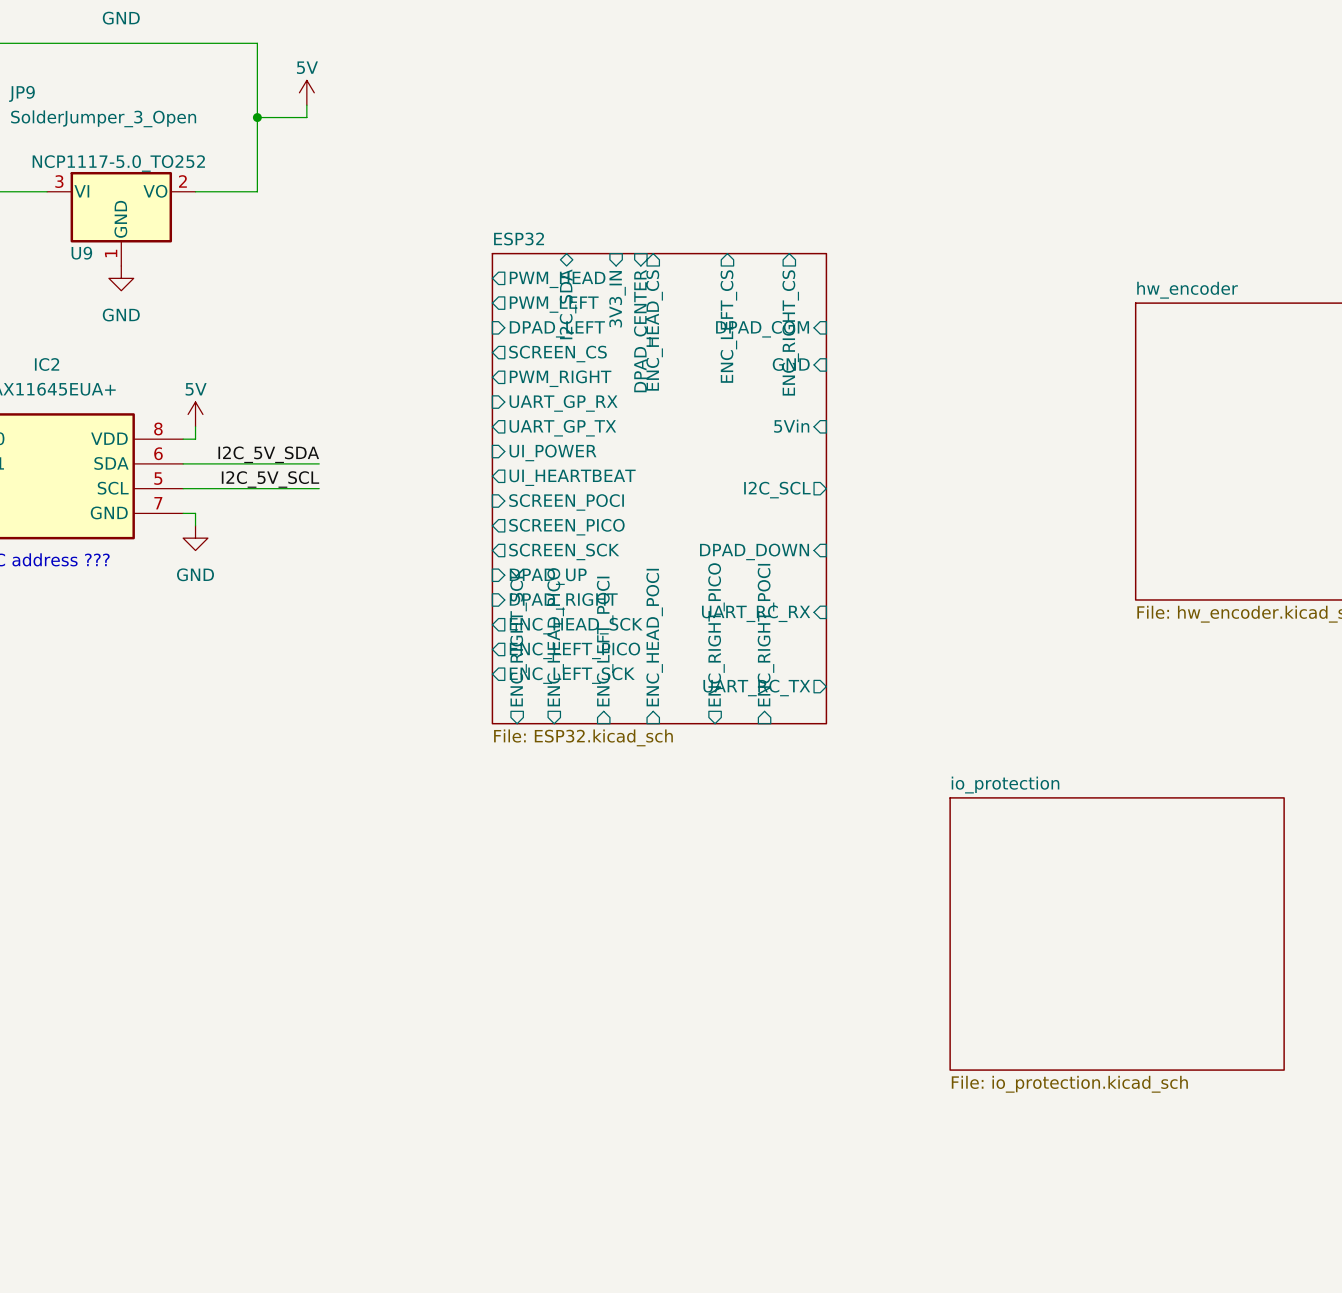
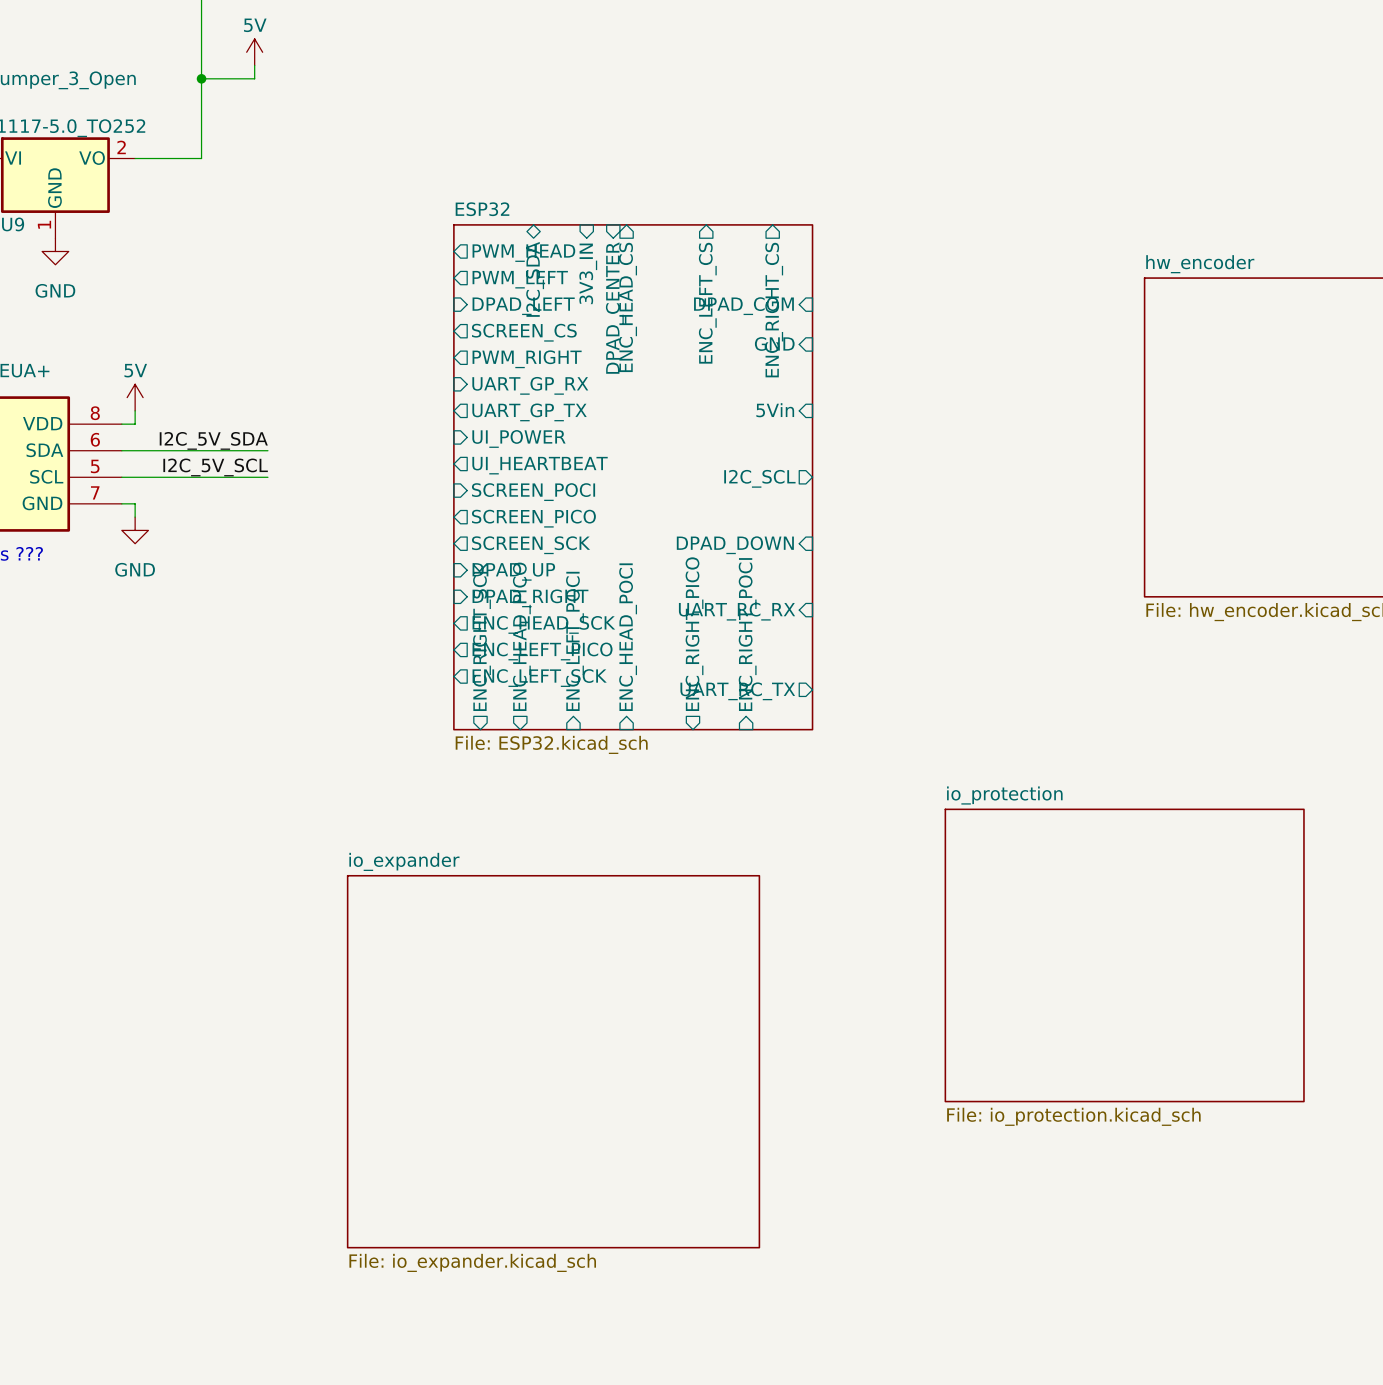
sheet io_expander: none -> File: io_expander.kicad_sch (553, 1061)

